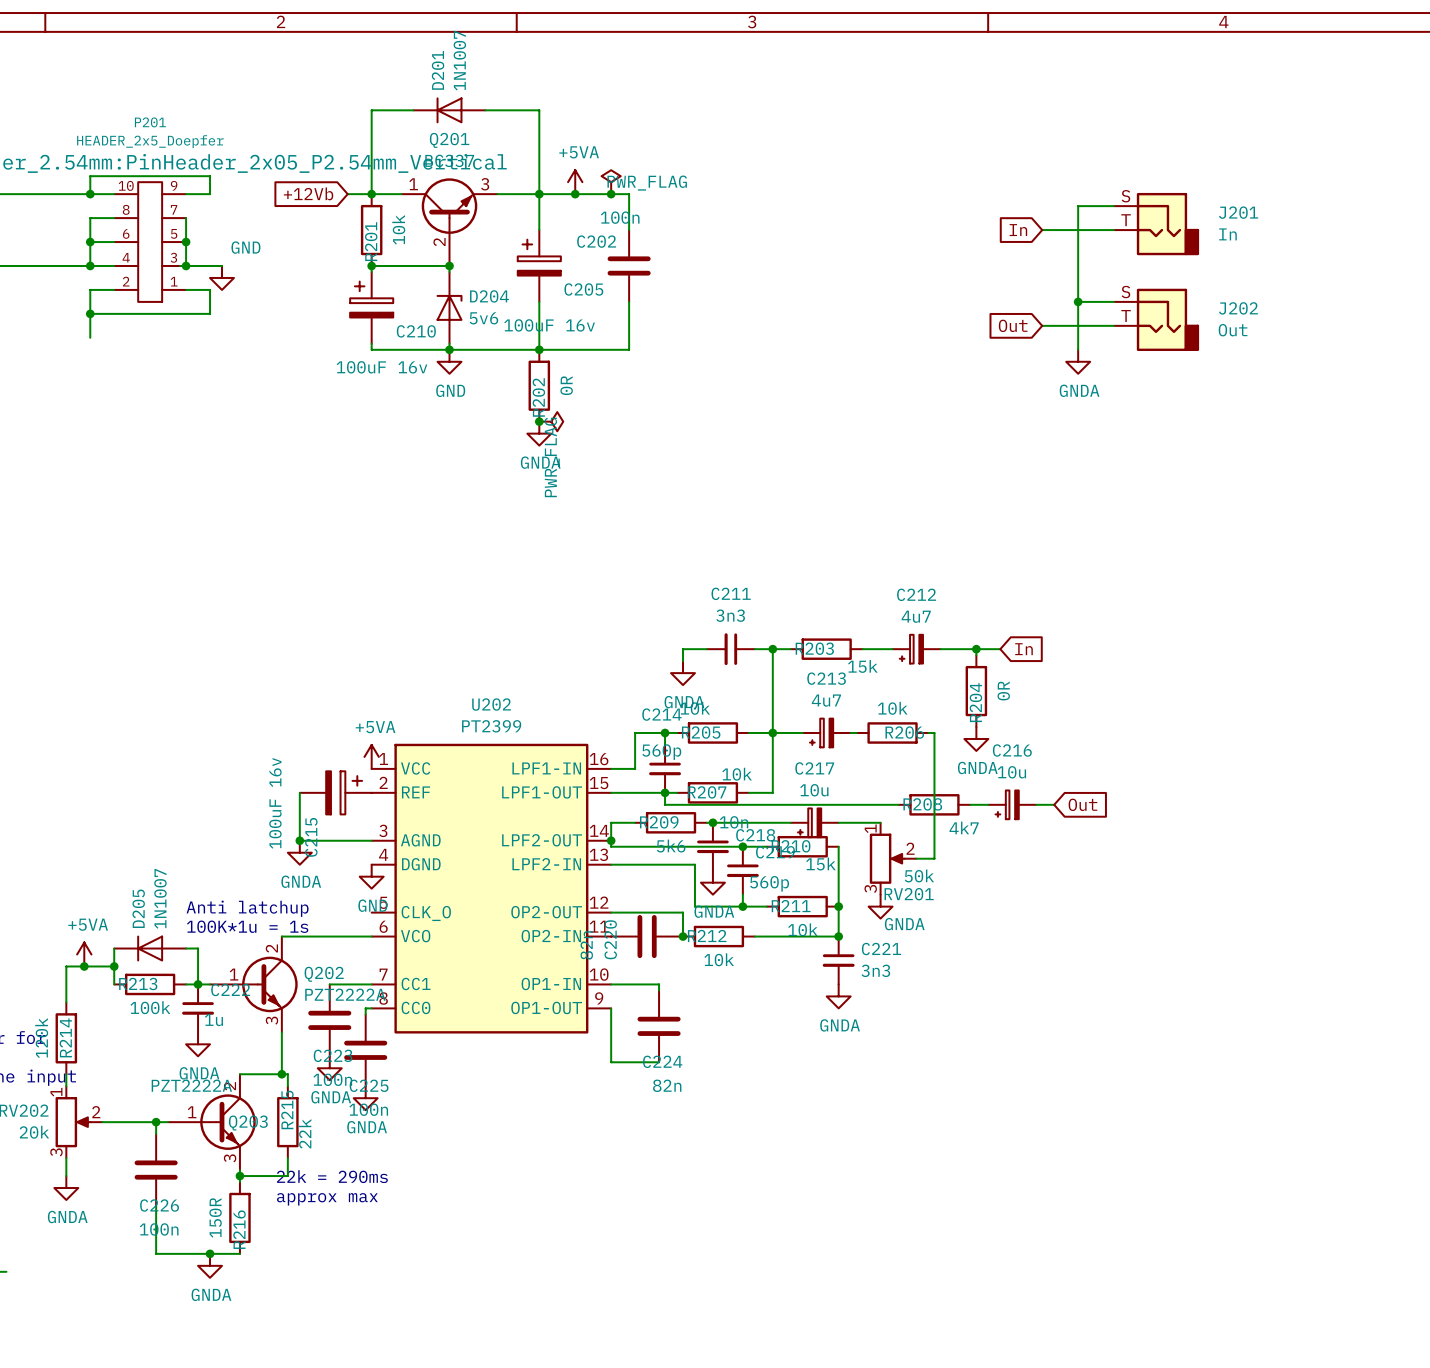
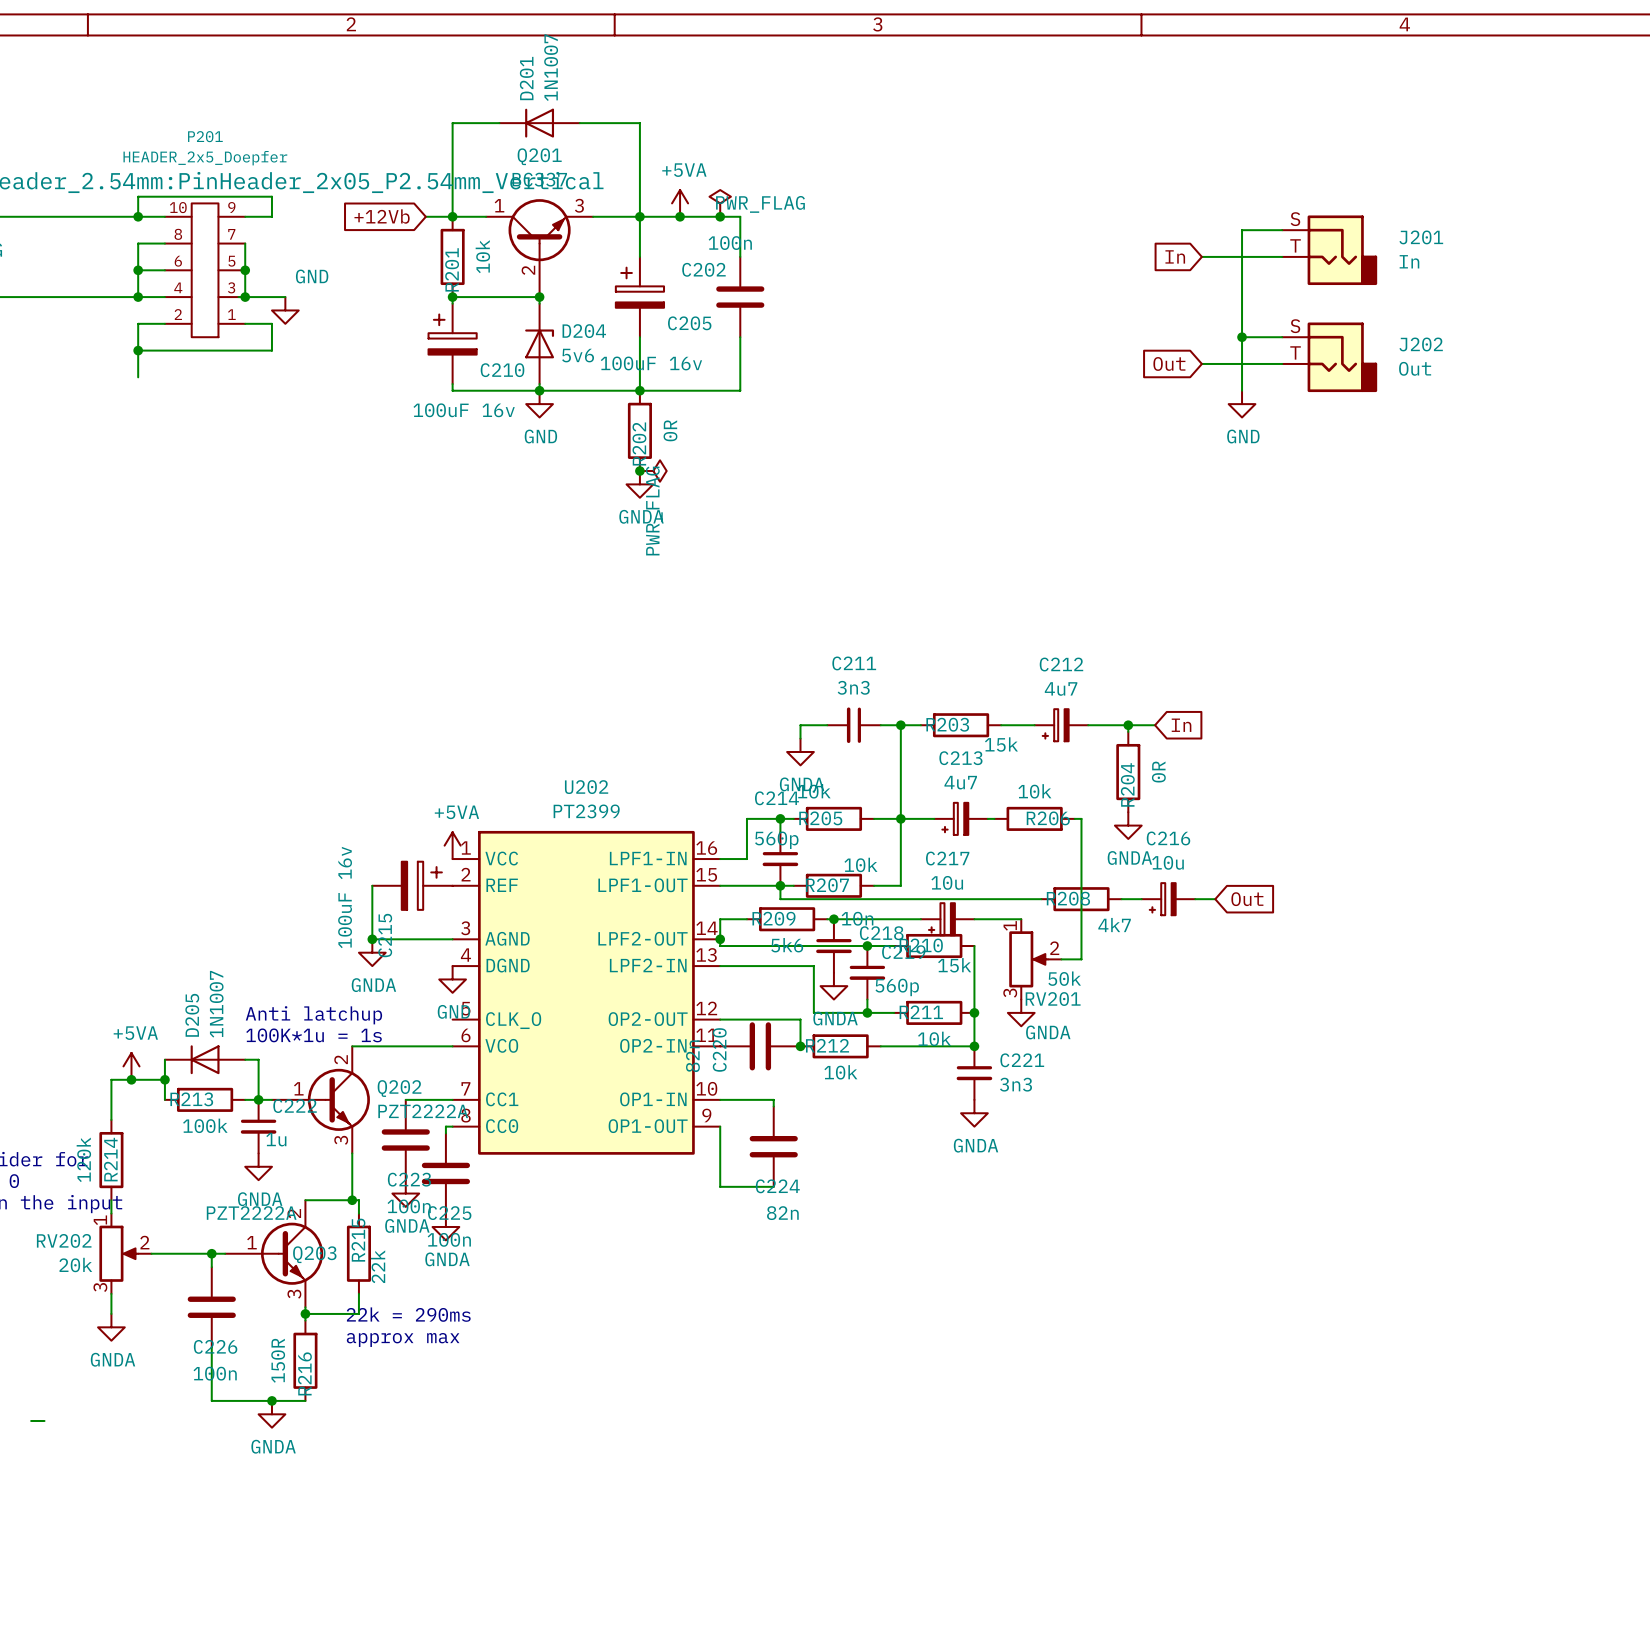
power symbol: GNDA (1078, 361) -> GND (1242, 404)

